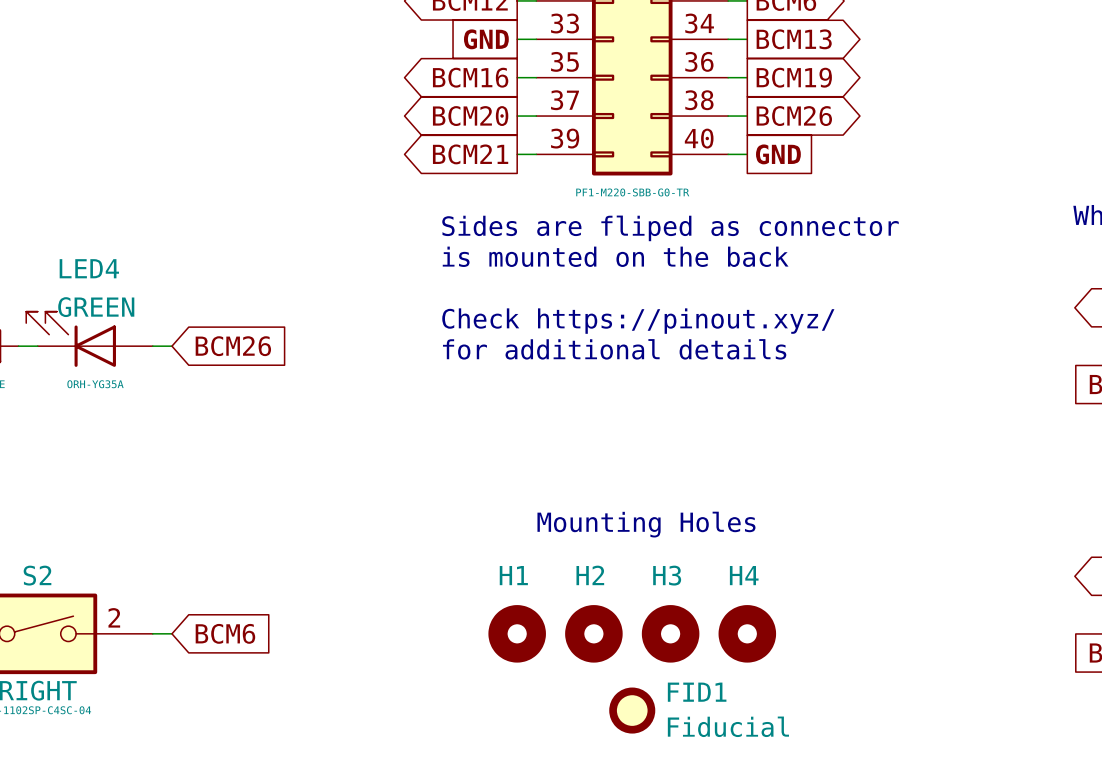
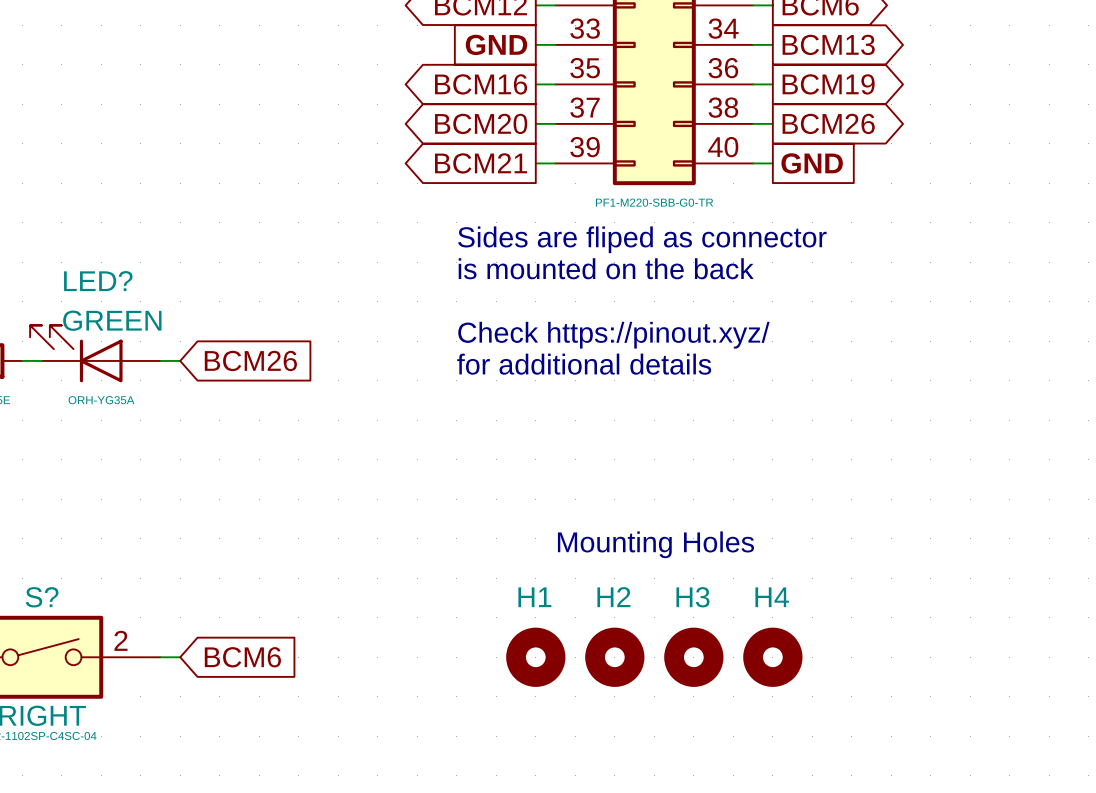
LED4 name: LED4 (89, 268) -> LED? (98, 281)
S2 name: S2 (37, 575) -> S? (42, 597)
FID1: Fiducial (632, 710) -> none

